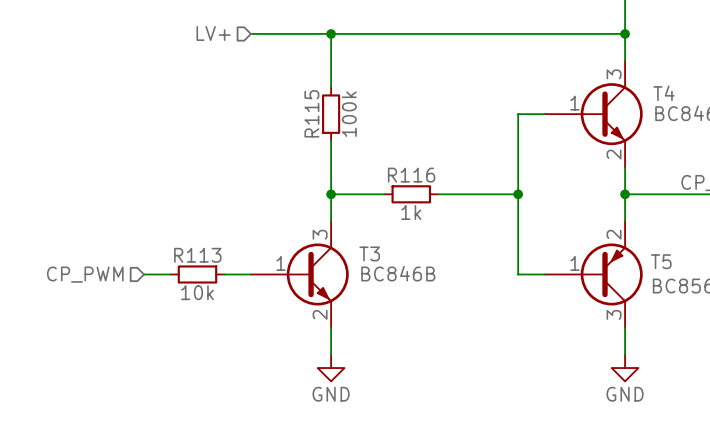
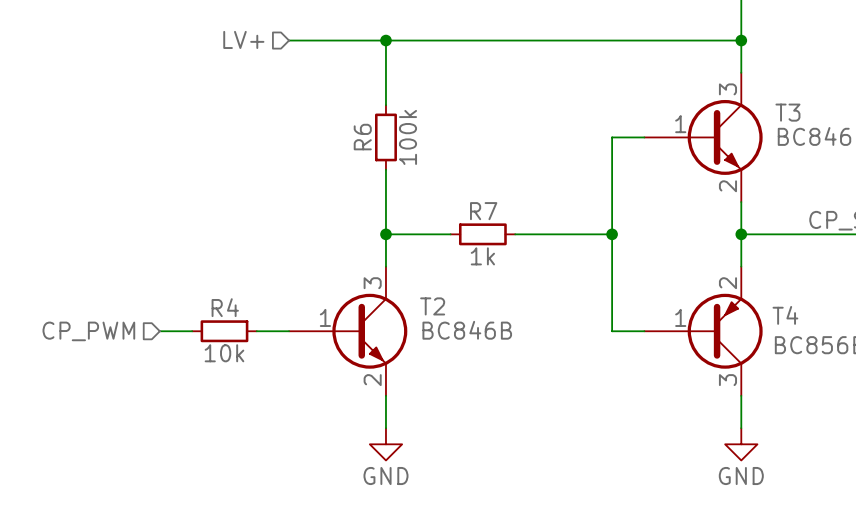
T4 name: T4 (663, 93) -> T3 (787, 112)
R115 name: R115 (311, 113) -> R6 (362, 137)
R116 name: R116 (411, 175) -> R7 (483, 211)
T3 name: T3 (369, 253) -> T2 (432, 306)
R113 name: R113 (197, 255) -> R4 (225, 307)
T5 name: T5 (661, 261) -> T4 (785, 315)

